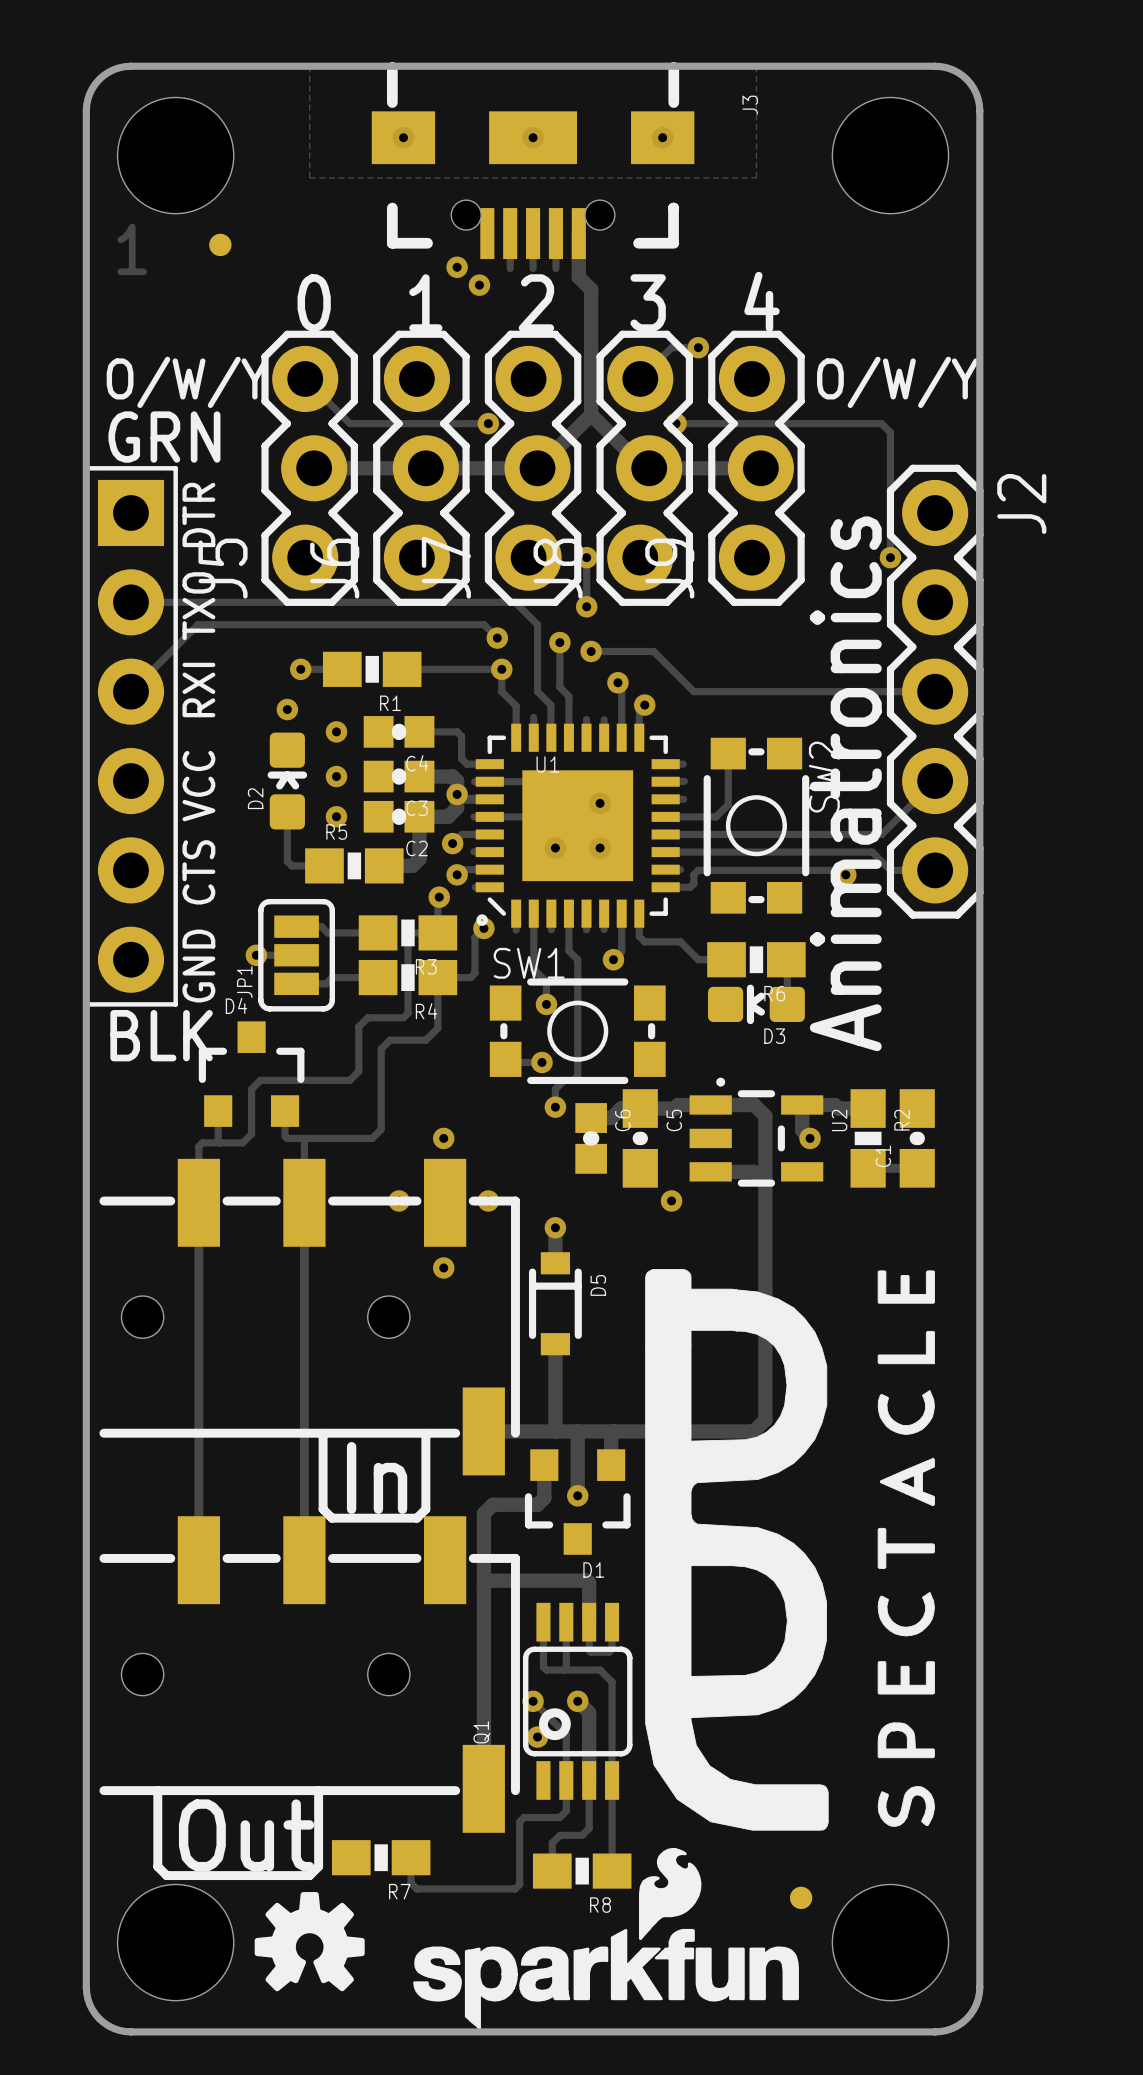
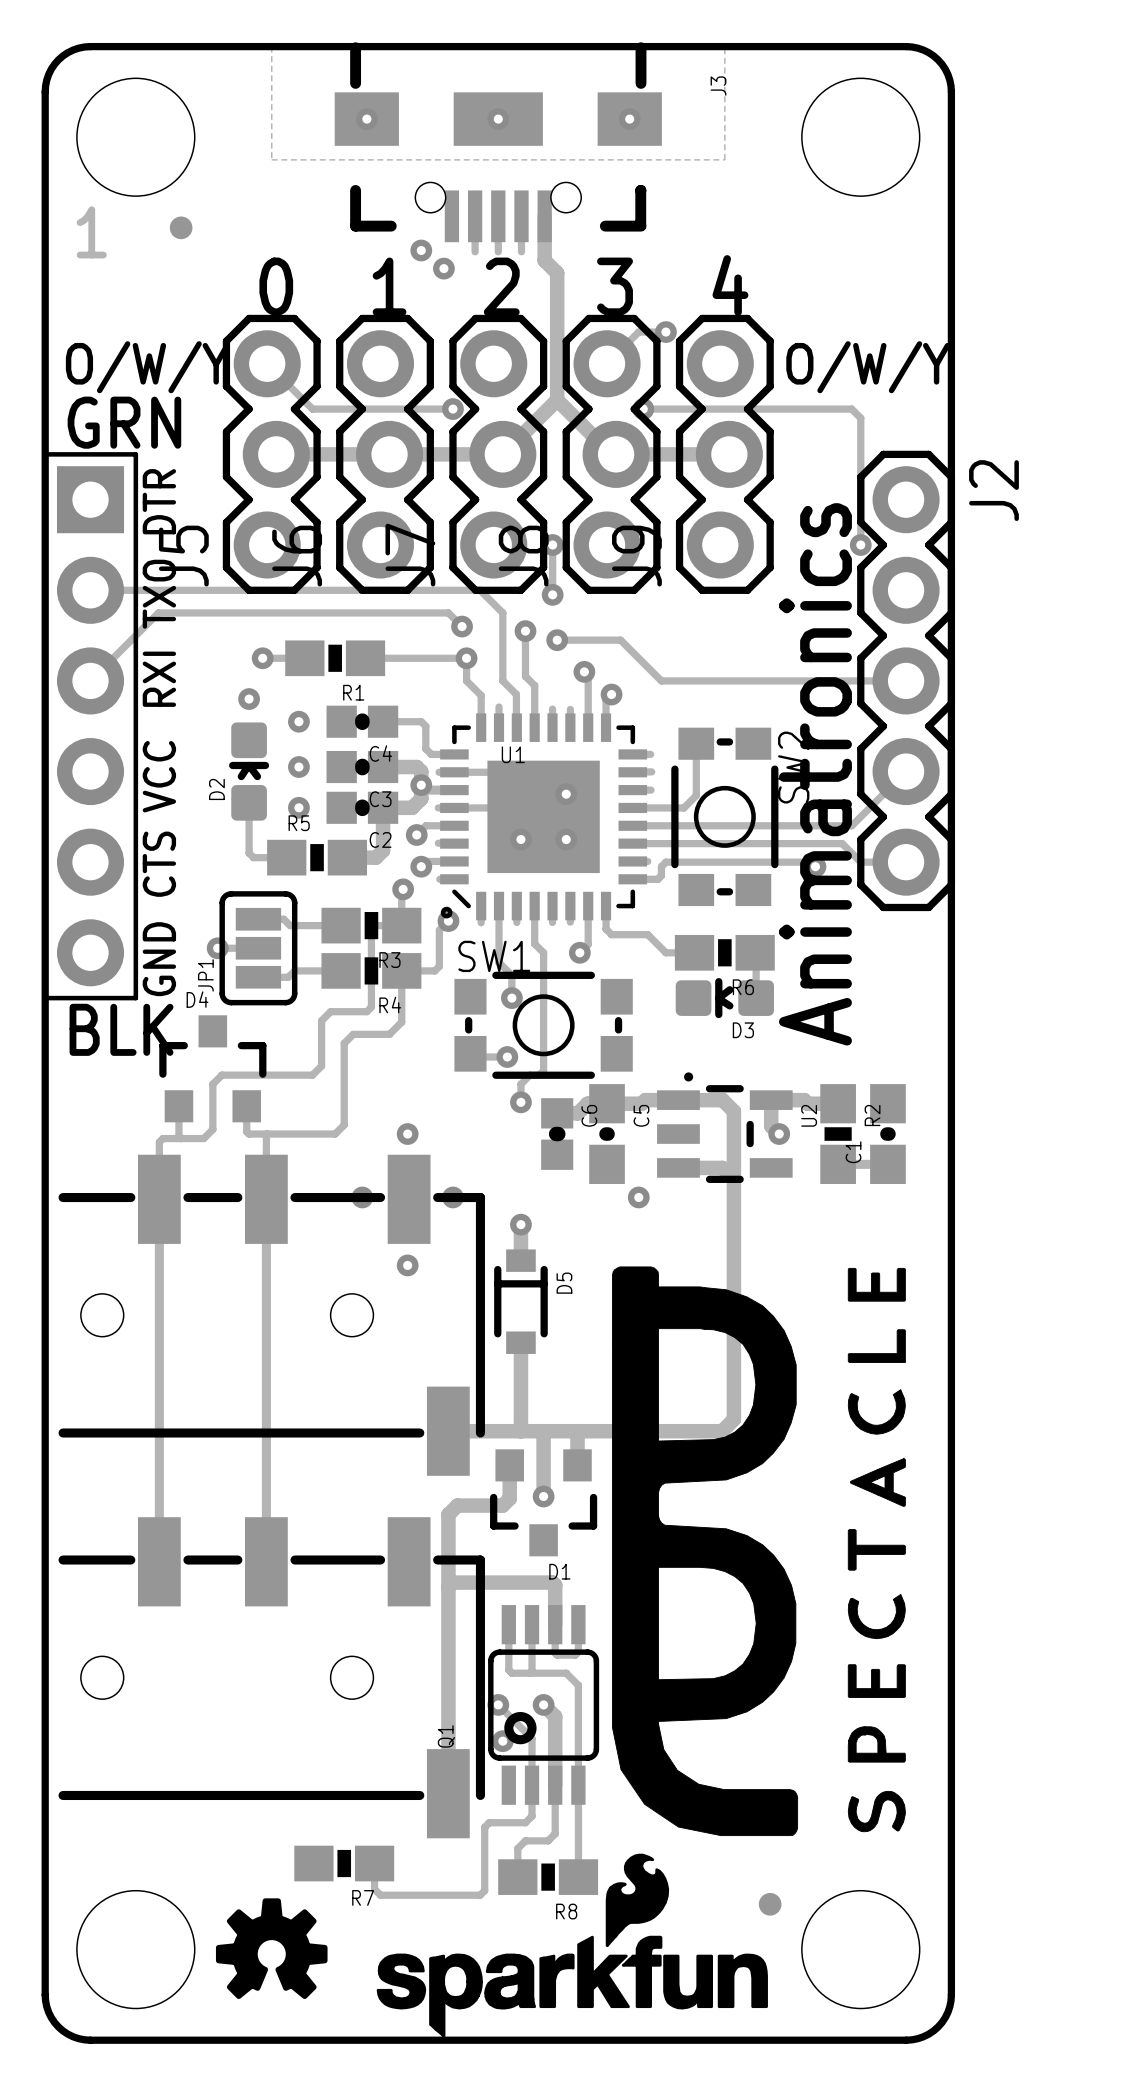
line: (323, 1433) (323, 1509) (332, 1518) (416, 1518) (425, 1509) (425, 1433) -> none
text: In (377, 1477) -> none
line: (157, 1790) (157, 1866) (166, 1875) (309, 1875) (318, 1866) (318, 1790) -> none
text: Out (246, 1835) -> none

